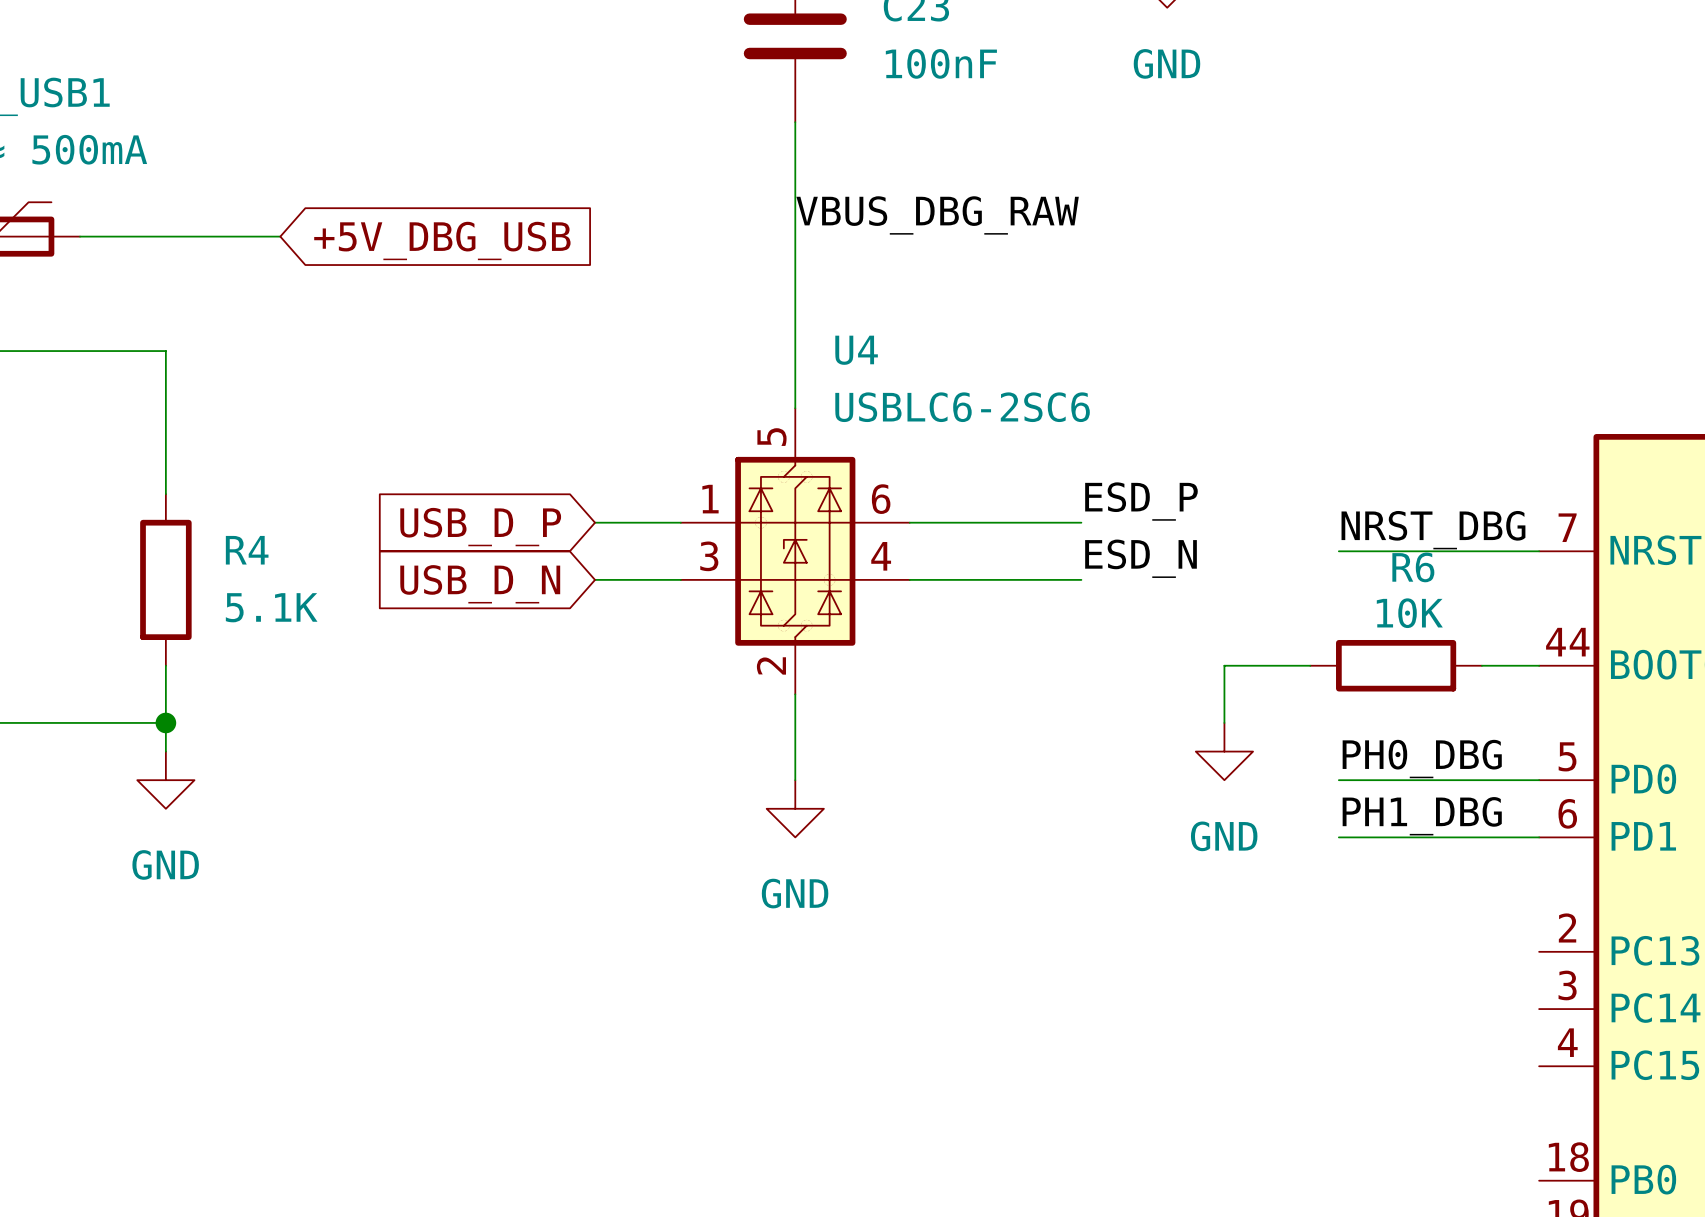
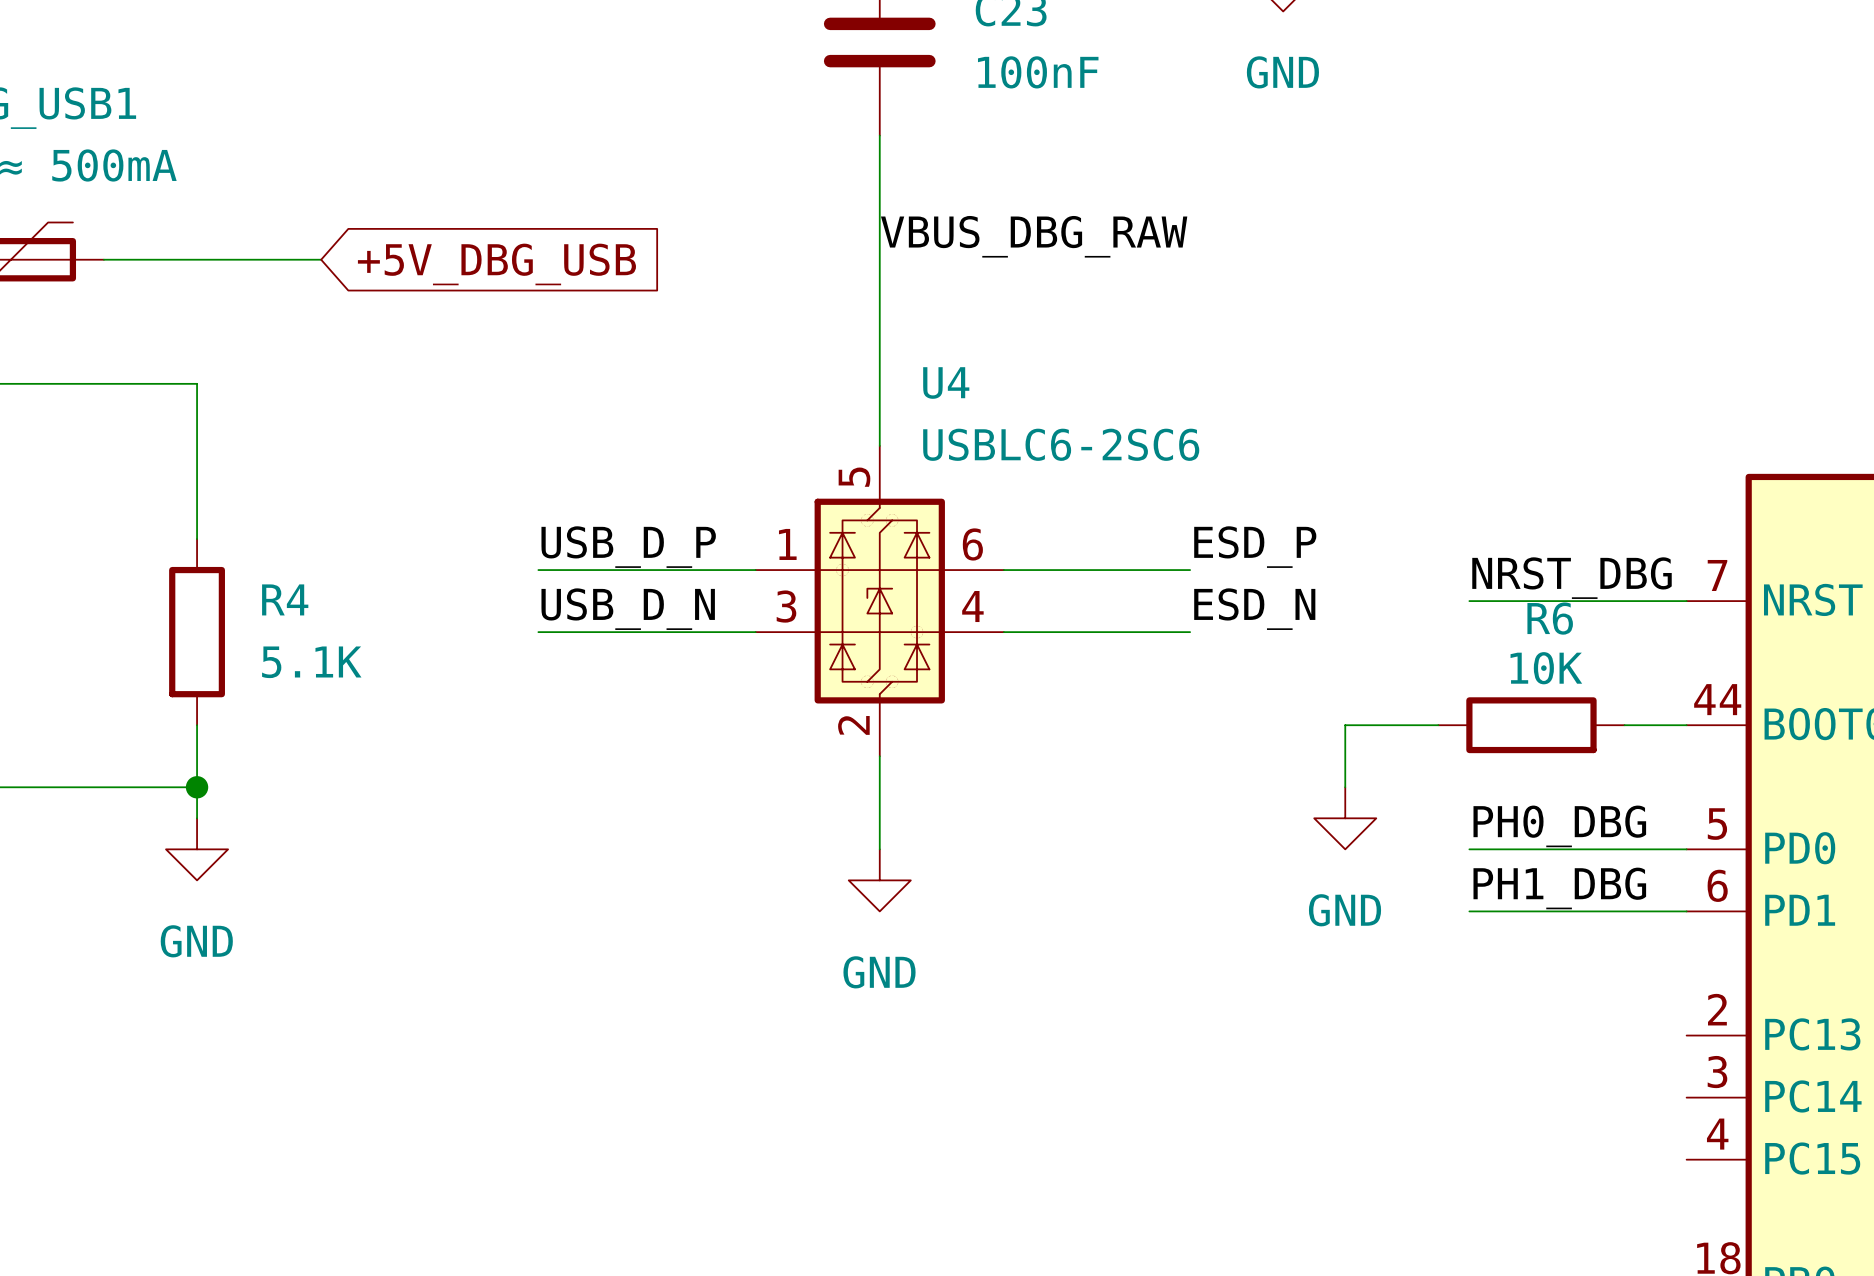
label: none -> USB_D_P (628, 547)
wire: none -> (538, 570) (662, 570)
global label: USB_D_P (480, 527) -> none
label: none -> USB_D_N (628, 609)
wire: none -> (538, 632) (662, 632)
global label: USB_D_N (480, 584) -> none

